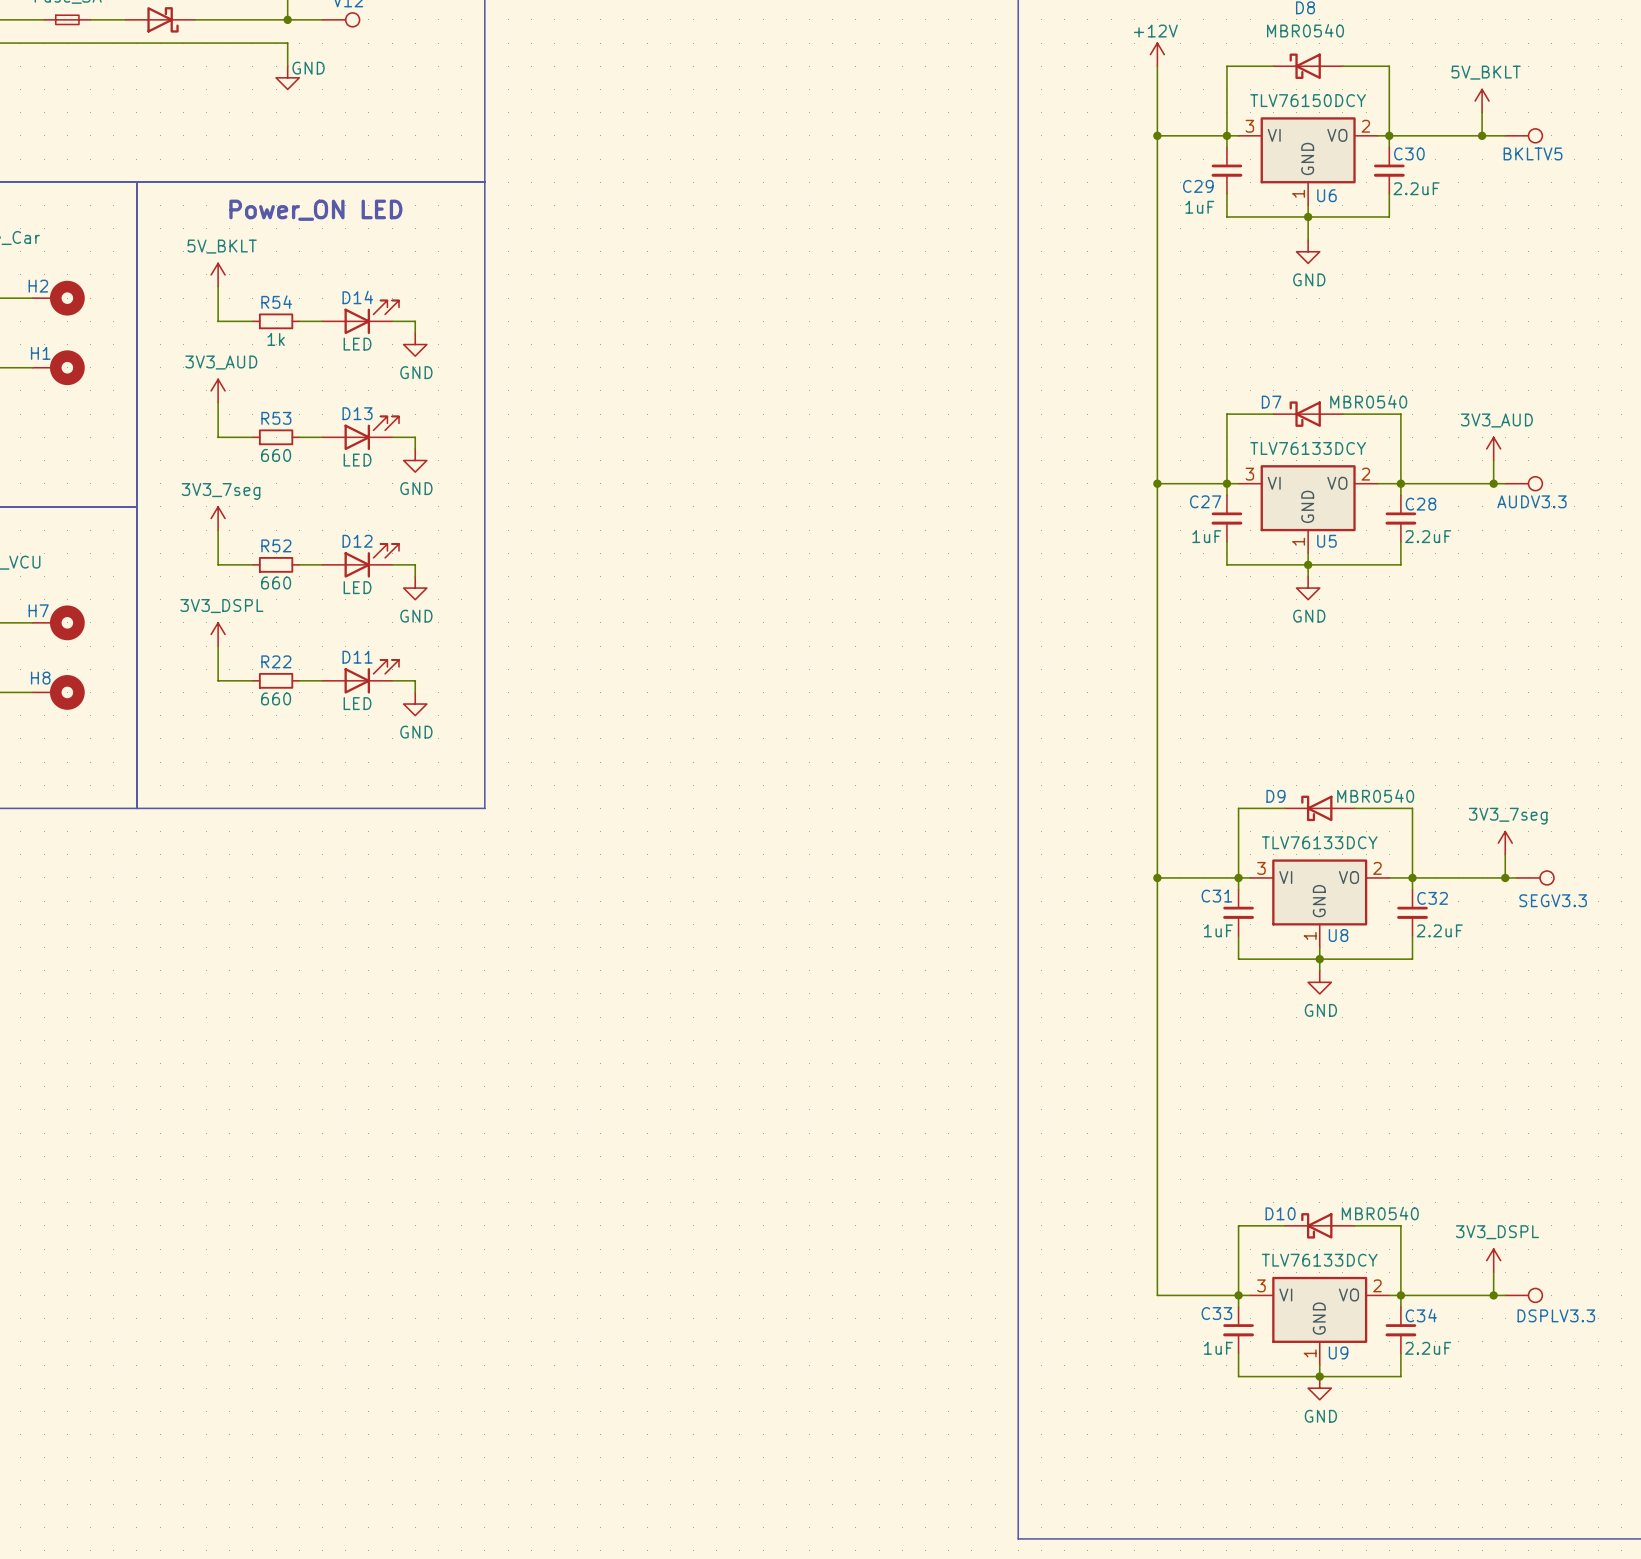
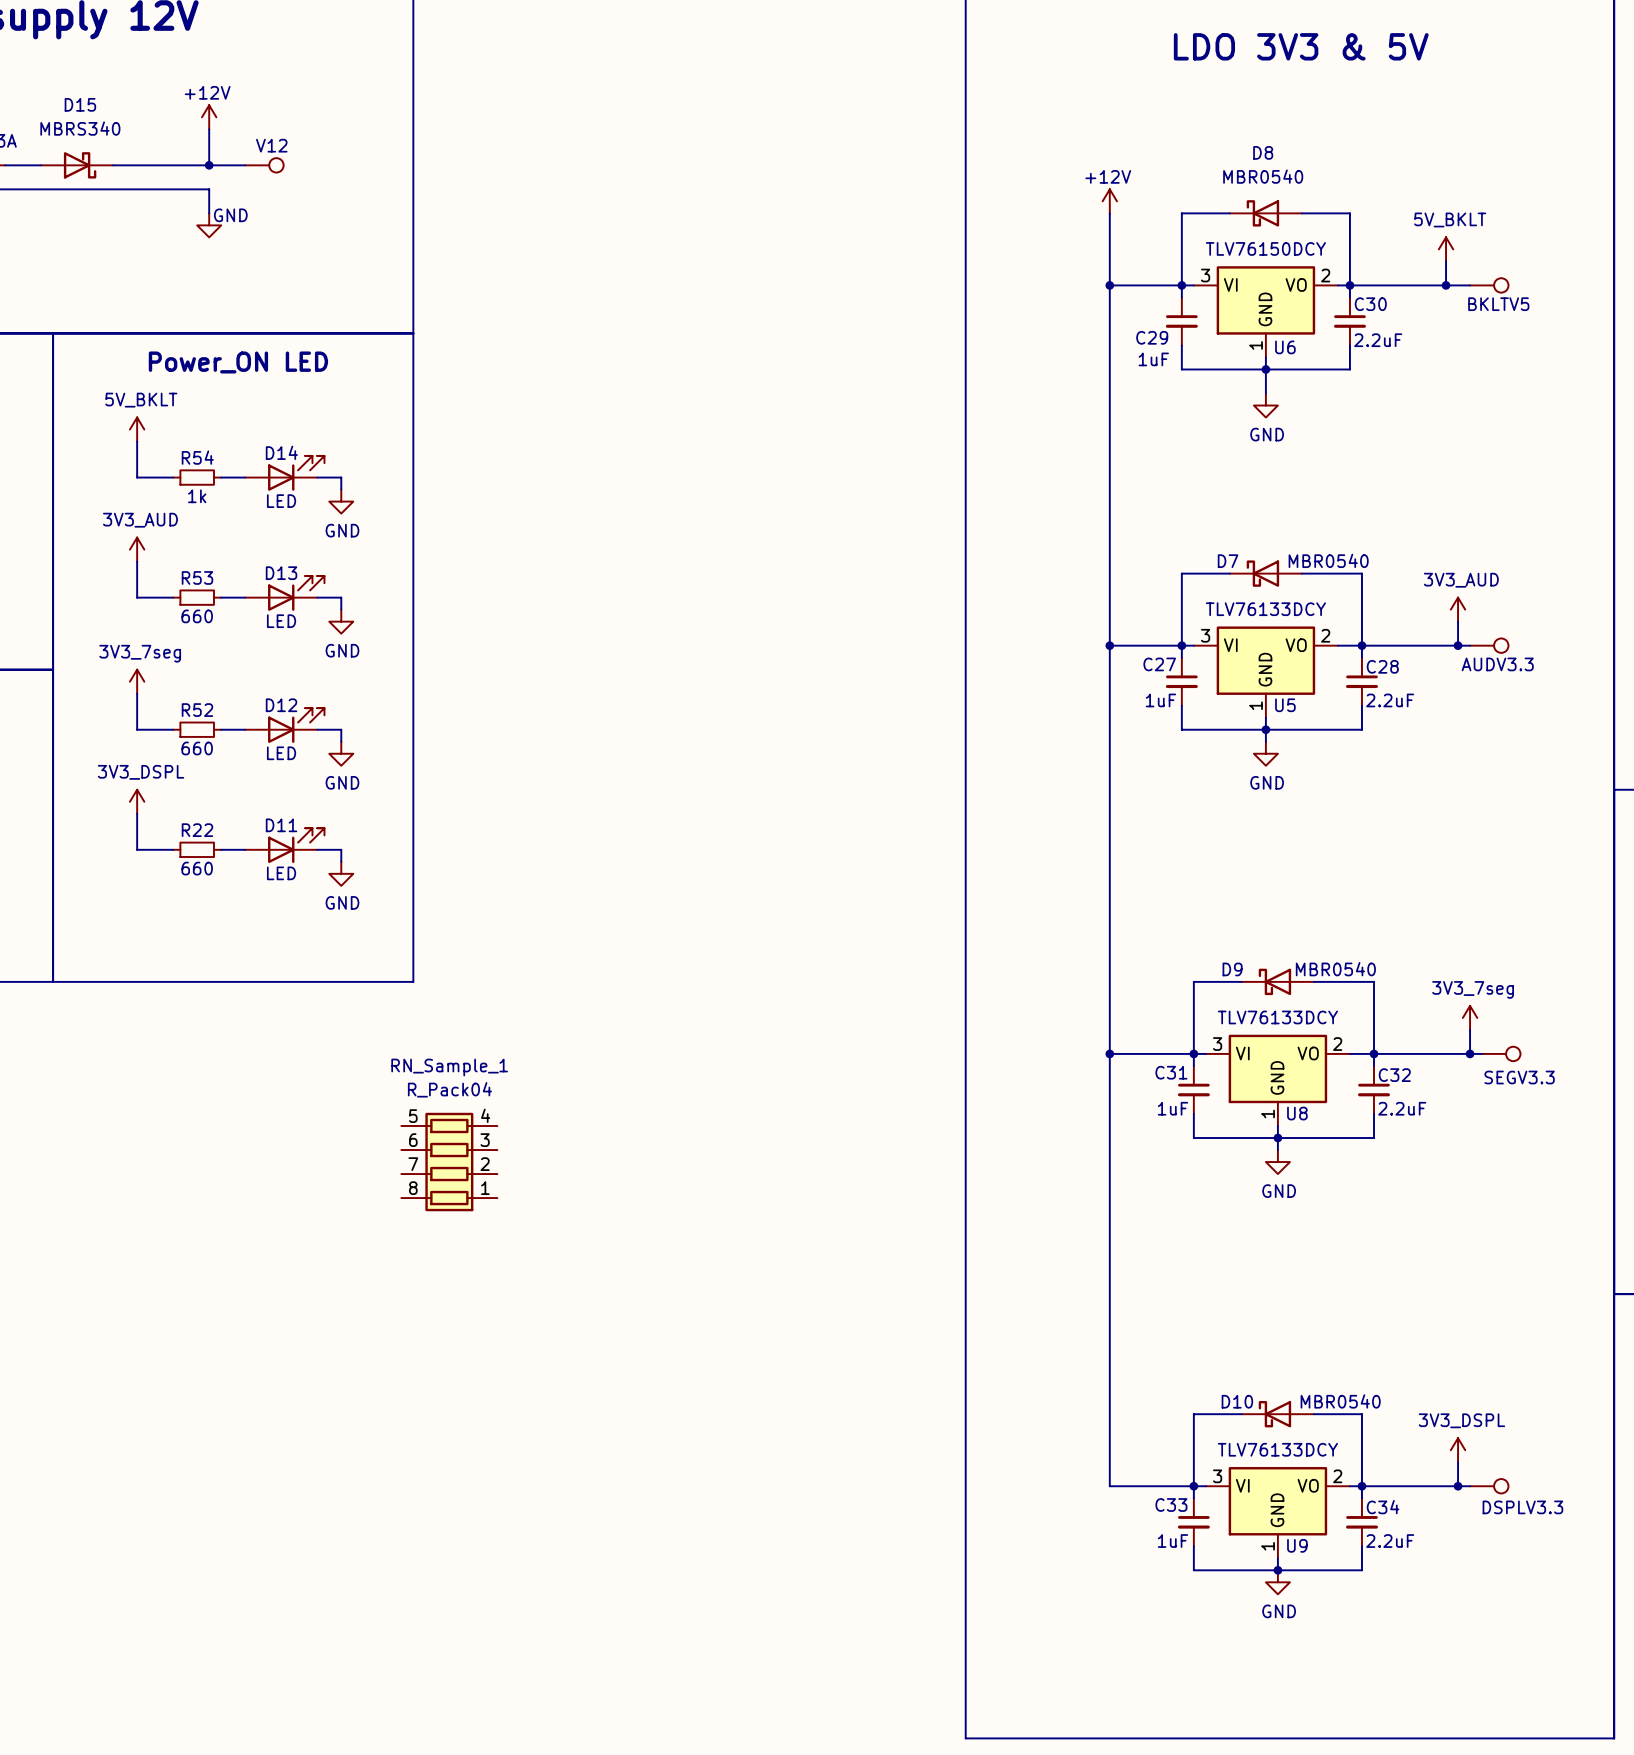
RN_Sample_1: none -> R_Pack04 (449, 1162)

